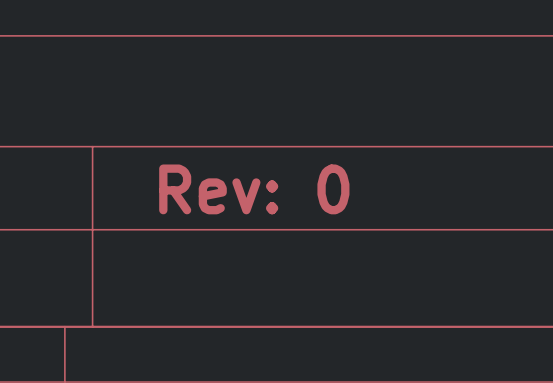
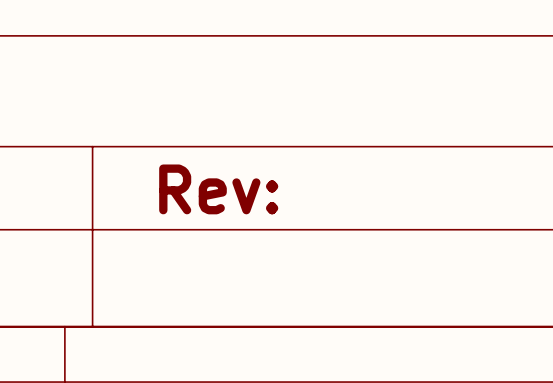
title block: Rev: 0 (254, 189) -> Rev: (218, 189)

